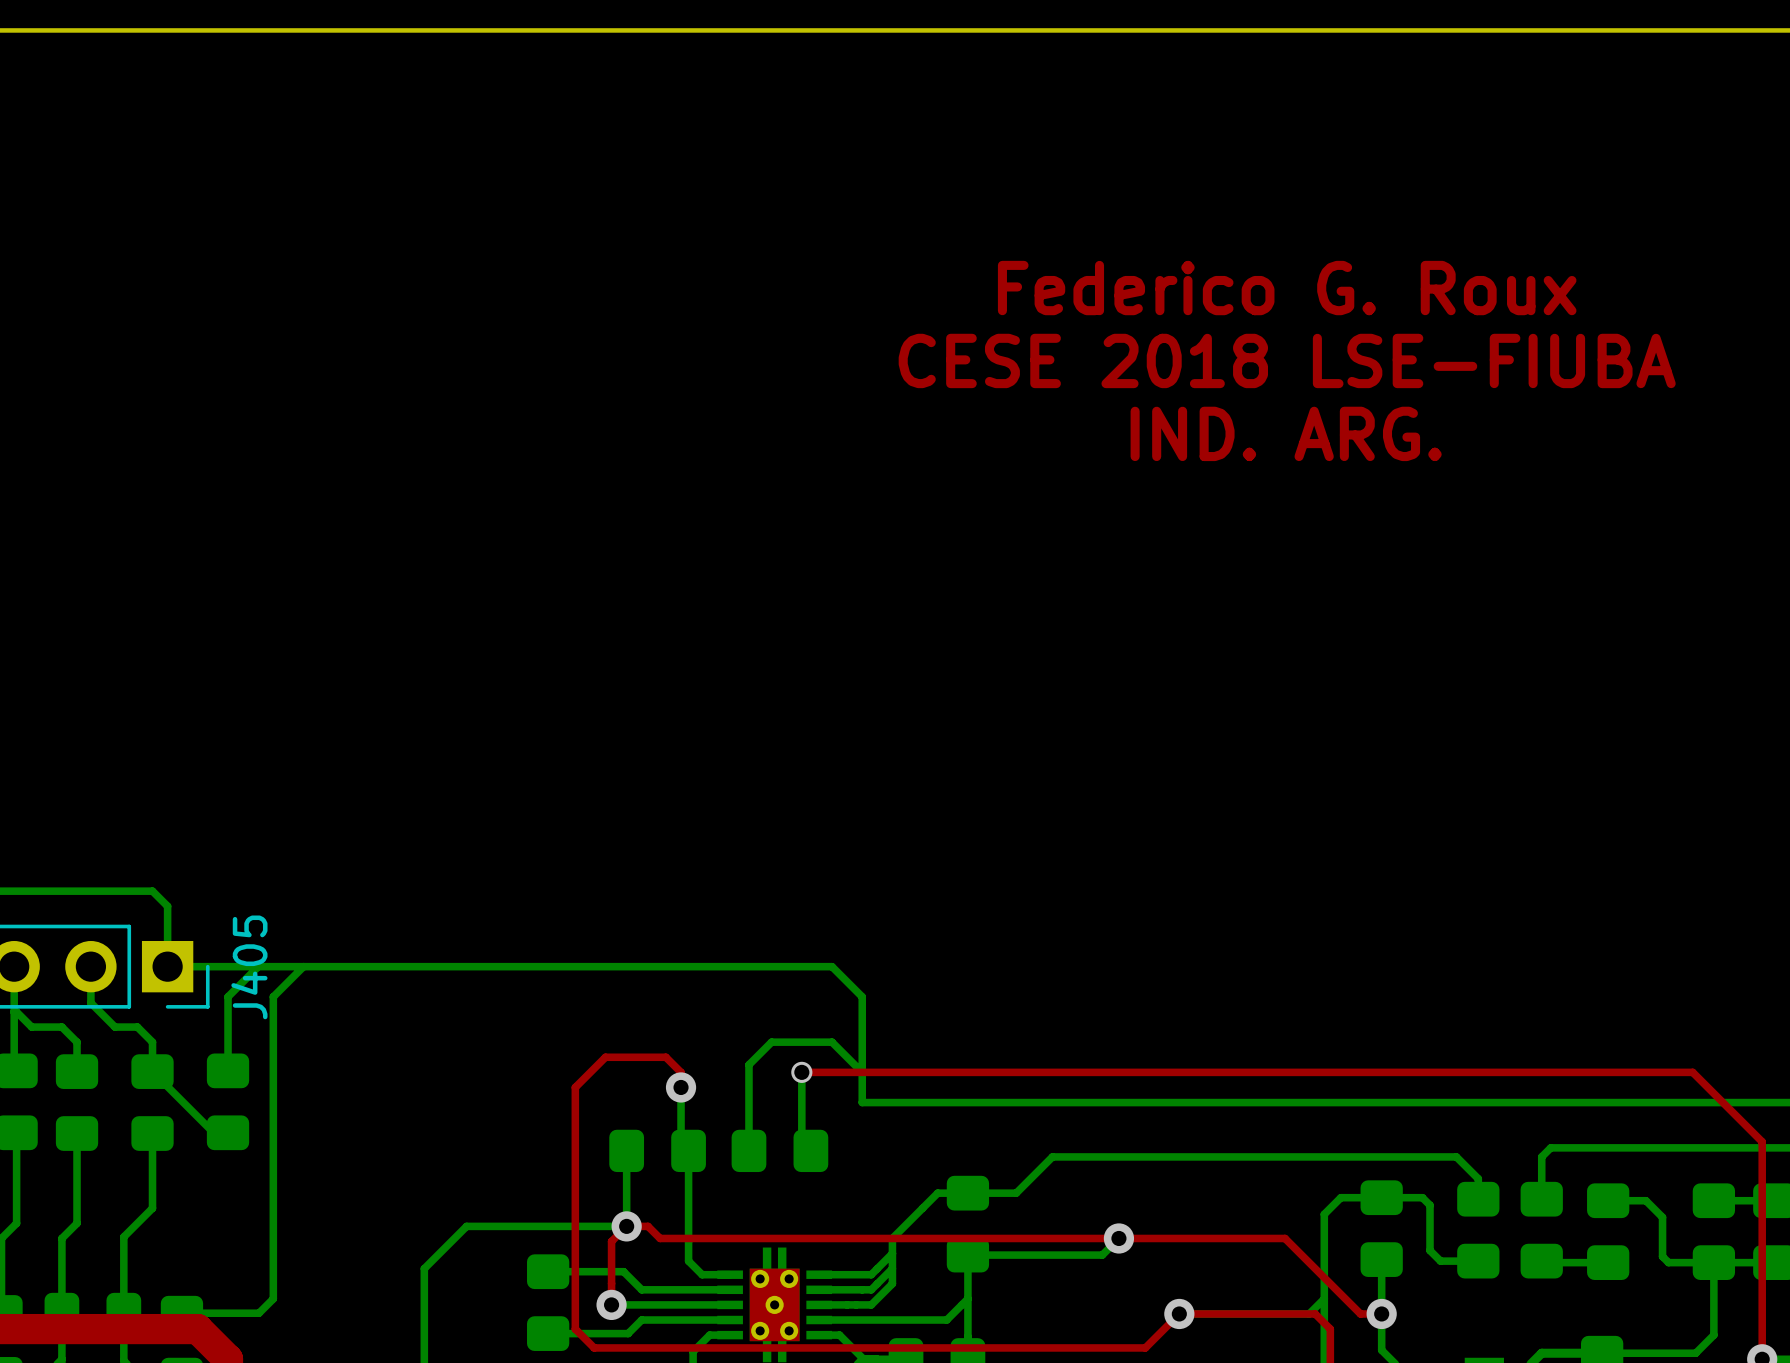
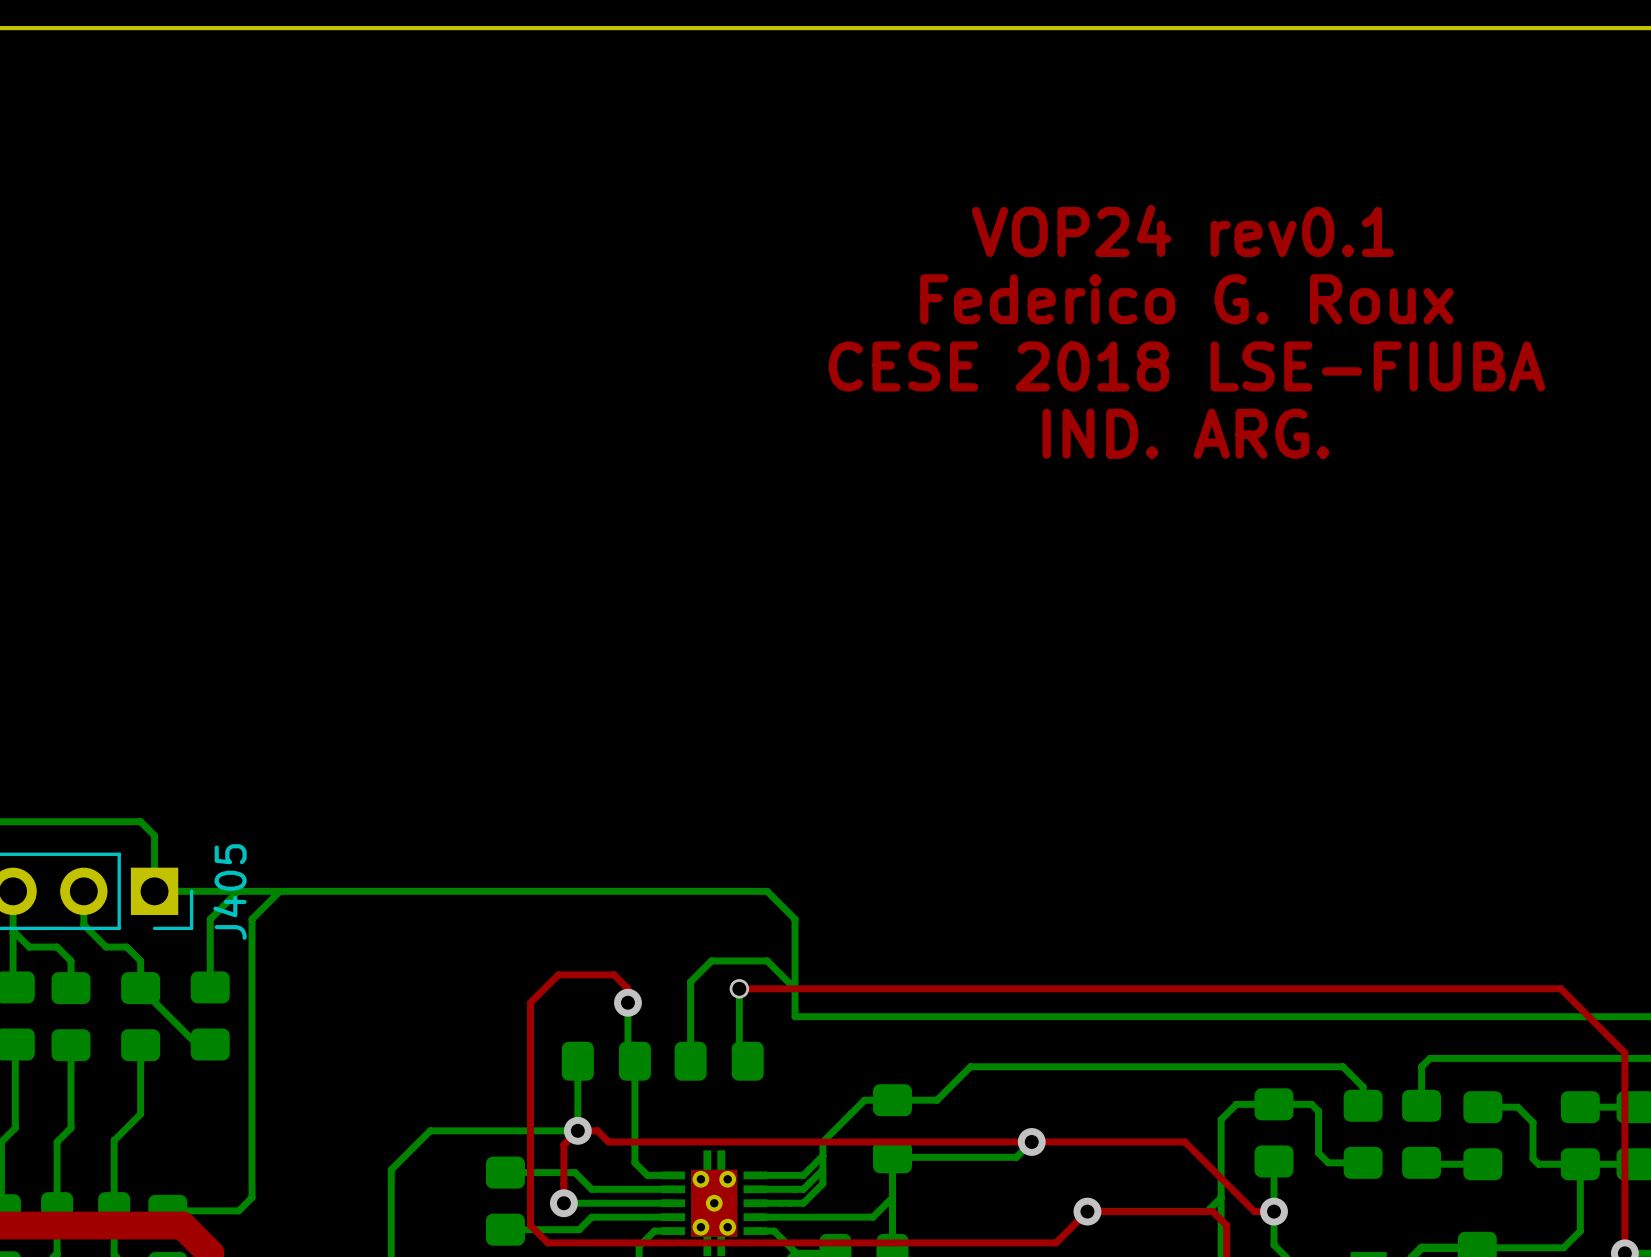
text: none -> VOP24 rev0.1 (1182, 230)
text position: Federico G. Roux (1287, 288) -> Federico G. Roux (1186, 299)
text position: CESE 2018 LSE-FIUBA (1287, 360) -> CESE 2018 LSE-FIUBA (1186, 366)
text position: IND. ARG. (1286, 433) -> IND. ARG. (1185, 433)

